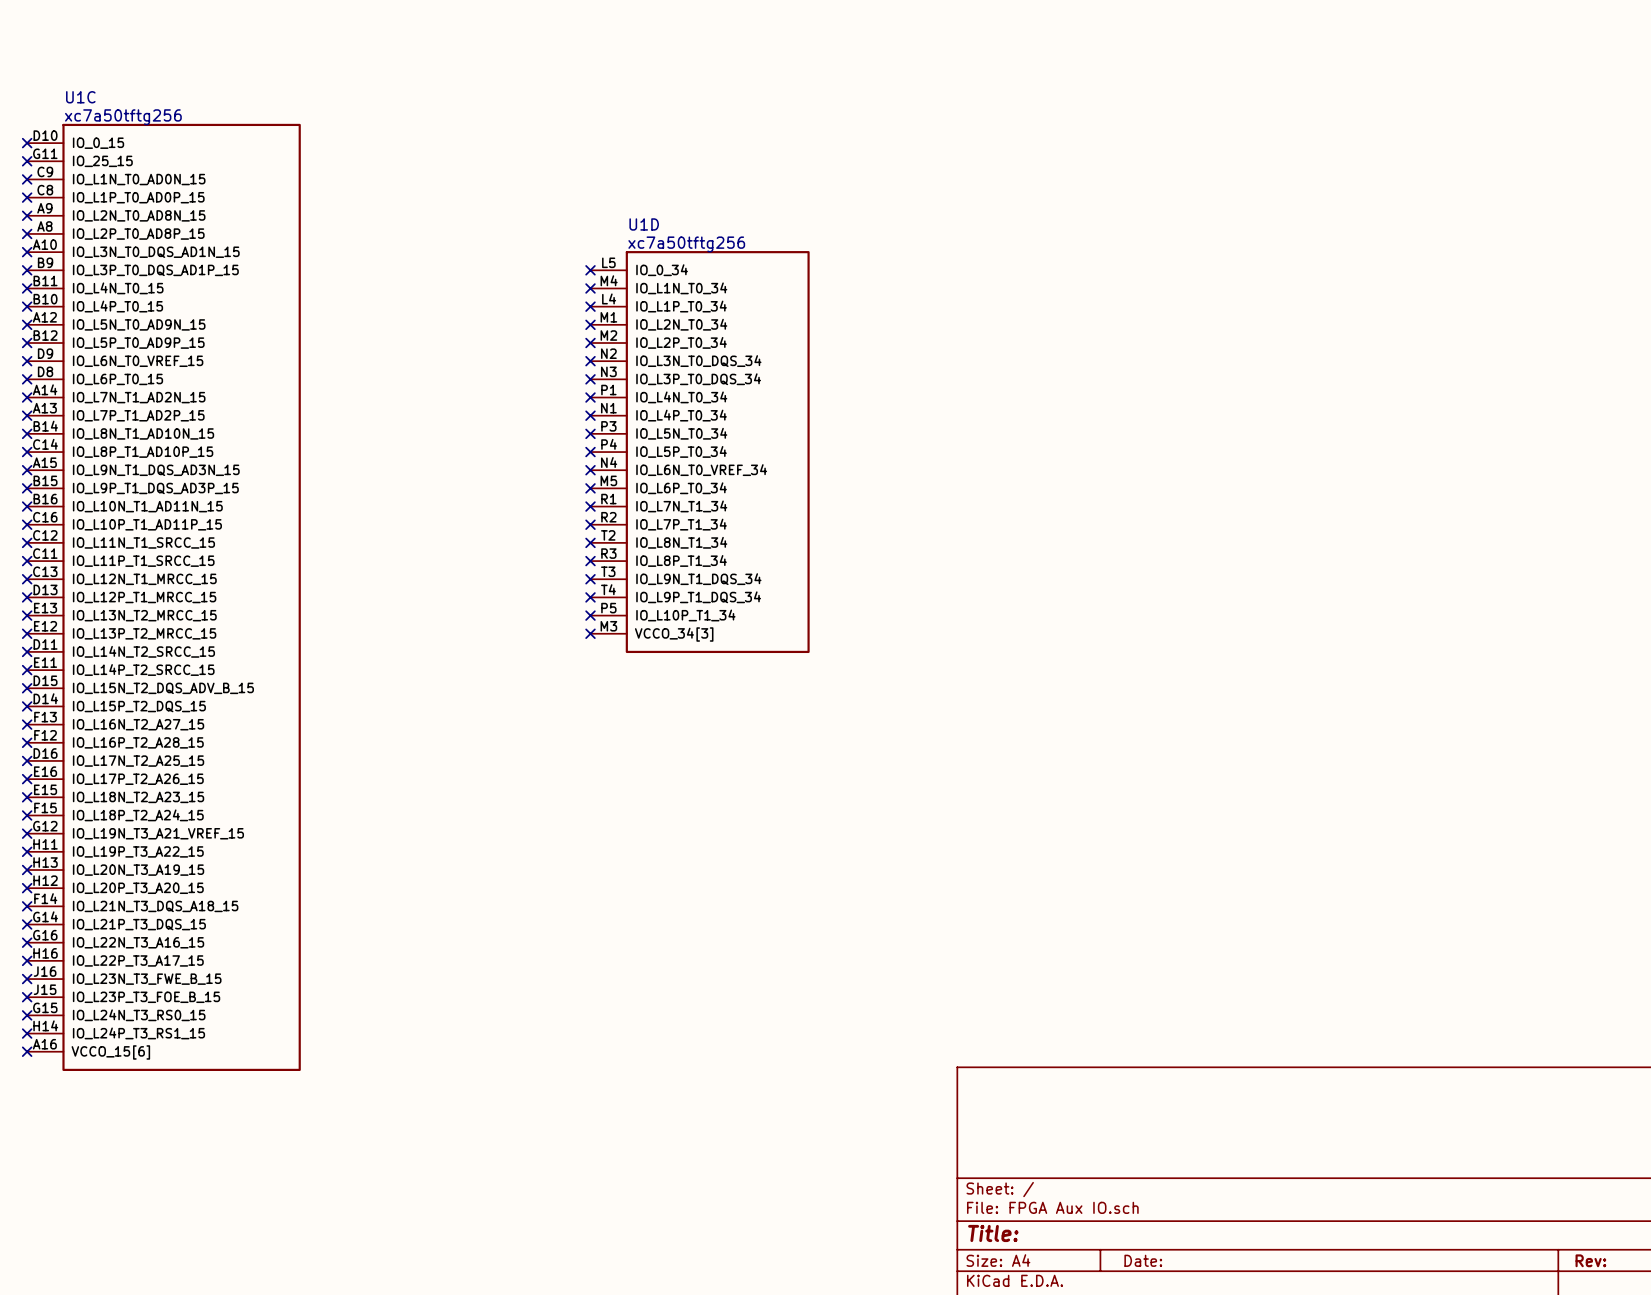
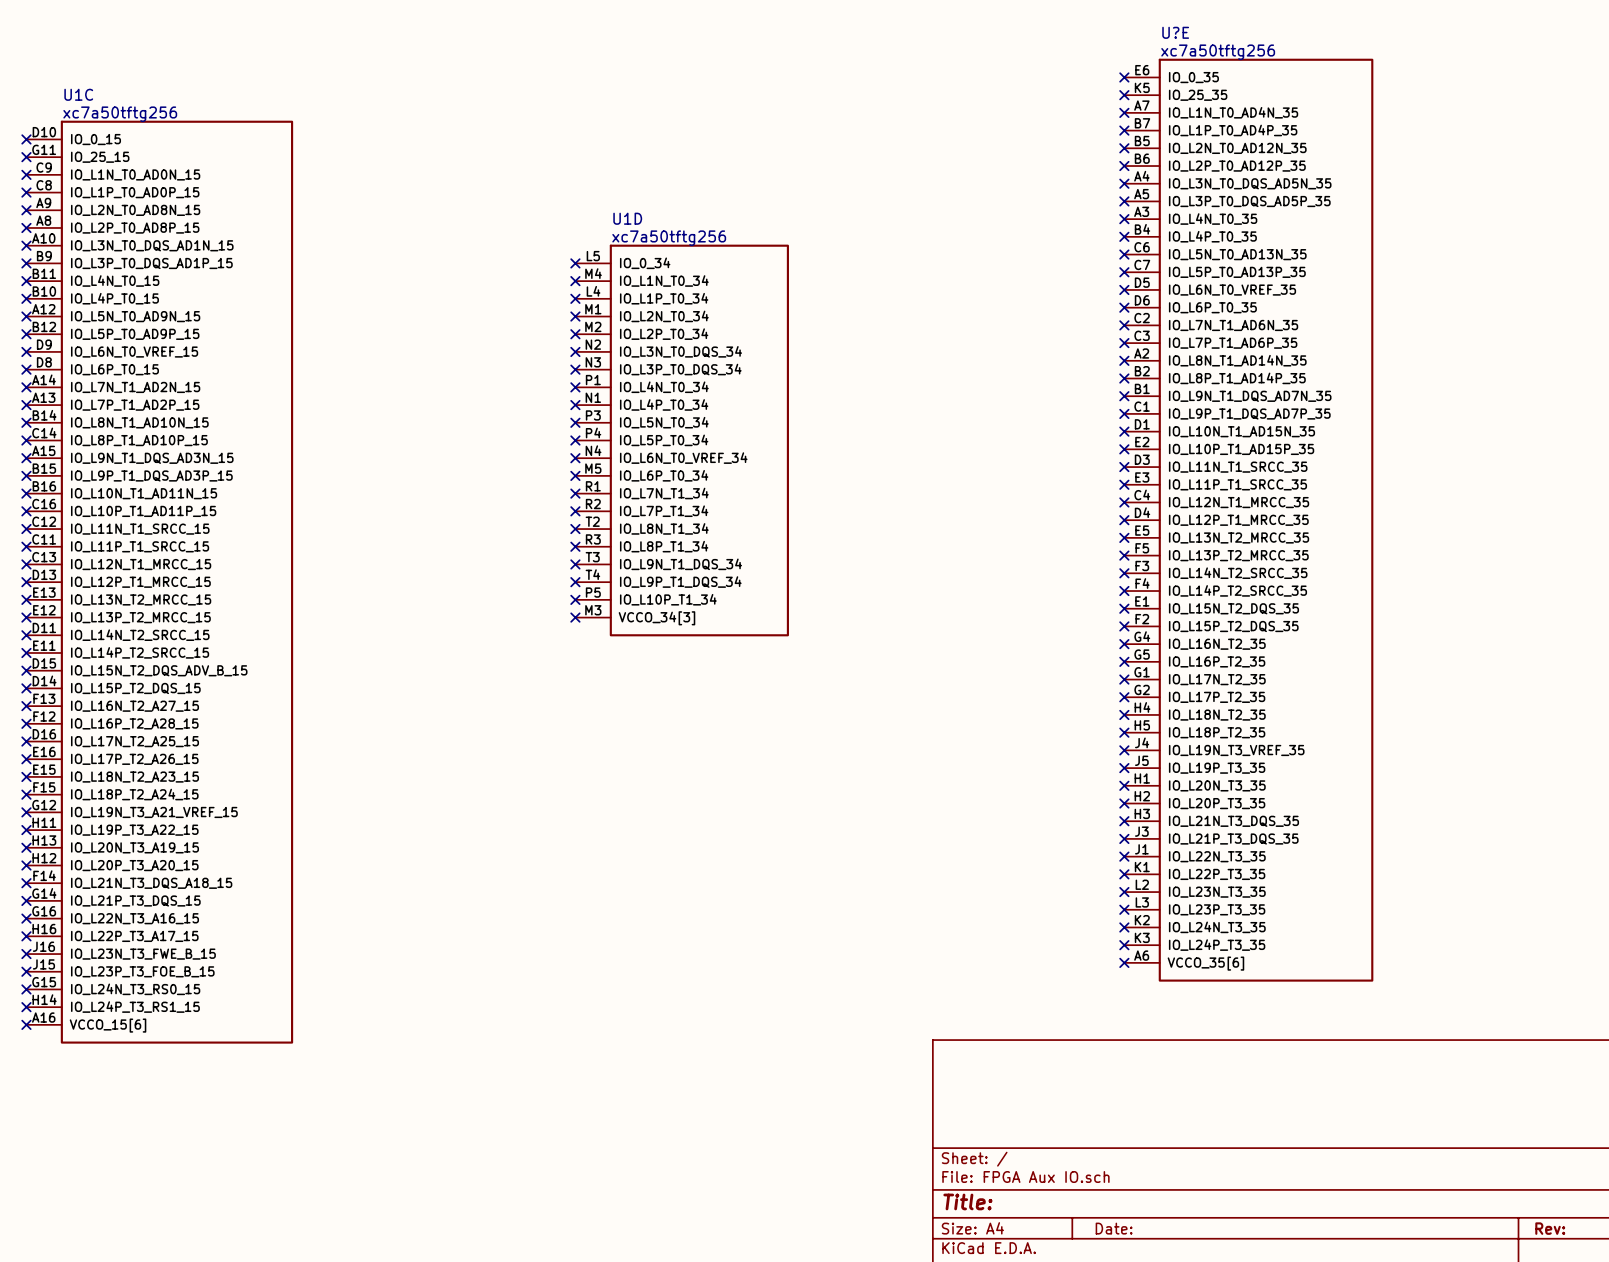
no-connect mark: none -> (1124, 77)
no-connect mark: none -> (1124, 95)
no-connect mark: none -> (1124, 112)
no-connect mark: none -> (1124, 130)
no-connect mark: none -> (1124, 148)
no-connect mark: none -> (1124, 166)
no-connect mark: none -> (1124, 183)
no-connect mark: none -> (1124, 201)
no-connect mark: none -> (1124, 219)
no-connect mark: none -> (1124, 236)
no-connect mark: none -> (1124, 254)
no-connect mark: none -> (1124, 272)
no-connect mark: none -> (1124, 289)
no-connect mark: none -> (1124, 307)
no-connect mark: none -> (1124, 325)
no-connect mark: none -> (1124, 343)
no-connect mark: none -> (1124, 360)
no-connect mark: none -> (1124, 378)
no-connect mark: none -> (1124, 396)
no-connect mark: none -> (1124, 413)
no-connect mark: none -> (1124, 431)
no-connect mark: none -> (1124, 449)
no-connect mark: none -> (1124, 467)
no-connect mark: none -> (1124, 484)
no-connect mark: none -> (1124, 502)
no-connect mark: none -> (1124, 520)
U?E: none -> xc7a50tftg256 (1248, 520)
no-connect mark: none -> (1124, 537)
no-connect mark: none -> (1124, 555)
no-connect mark: none -> (1124, 573)
no-connect mark: none -> (1124, 591)
no-connect mark: none -> (1124, 608)
no-connect mark: none -> (1124, 626)
no-connect mark: none -> (1124, 644)
no-connect mark: none -> (1124, 661)
no-connect mark: none -> (1124, 679)
no-connect mark: none -> (1124, 697)
no-connect mark: none -> (1124, 714)
no-connect mark: none -> (1124, 732)
no-connect mark: none -> (1124, 750)
no-connect mark: none -> (1124, 768)
no-connect mark: none -> (1124, 785)
no-connect mark: none -> (1124, 803)
no-connect mark: none -> (1124, 821)
no-connect mark: none -> (1124, 838)
no-connect mark: none -> (1124, 856)
no-connect mark: none -> (1124, 874)
no-connect mark: none -> (1124, 892)
no-connect mark: none -> (1124, 909)
no-connect mark: none -> (1124, 927)
no-connect mark: none -> (1124, 945)
no-connect mark: none -> (1124, 962)

